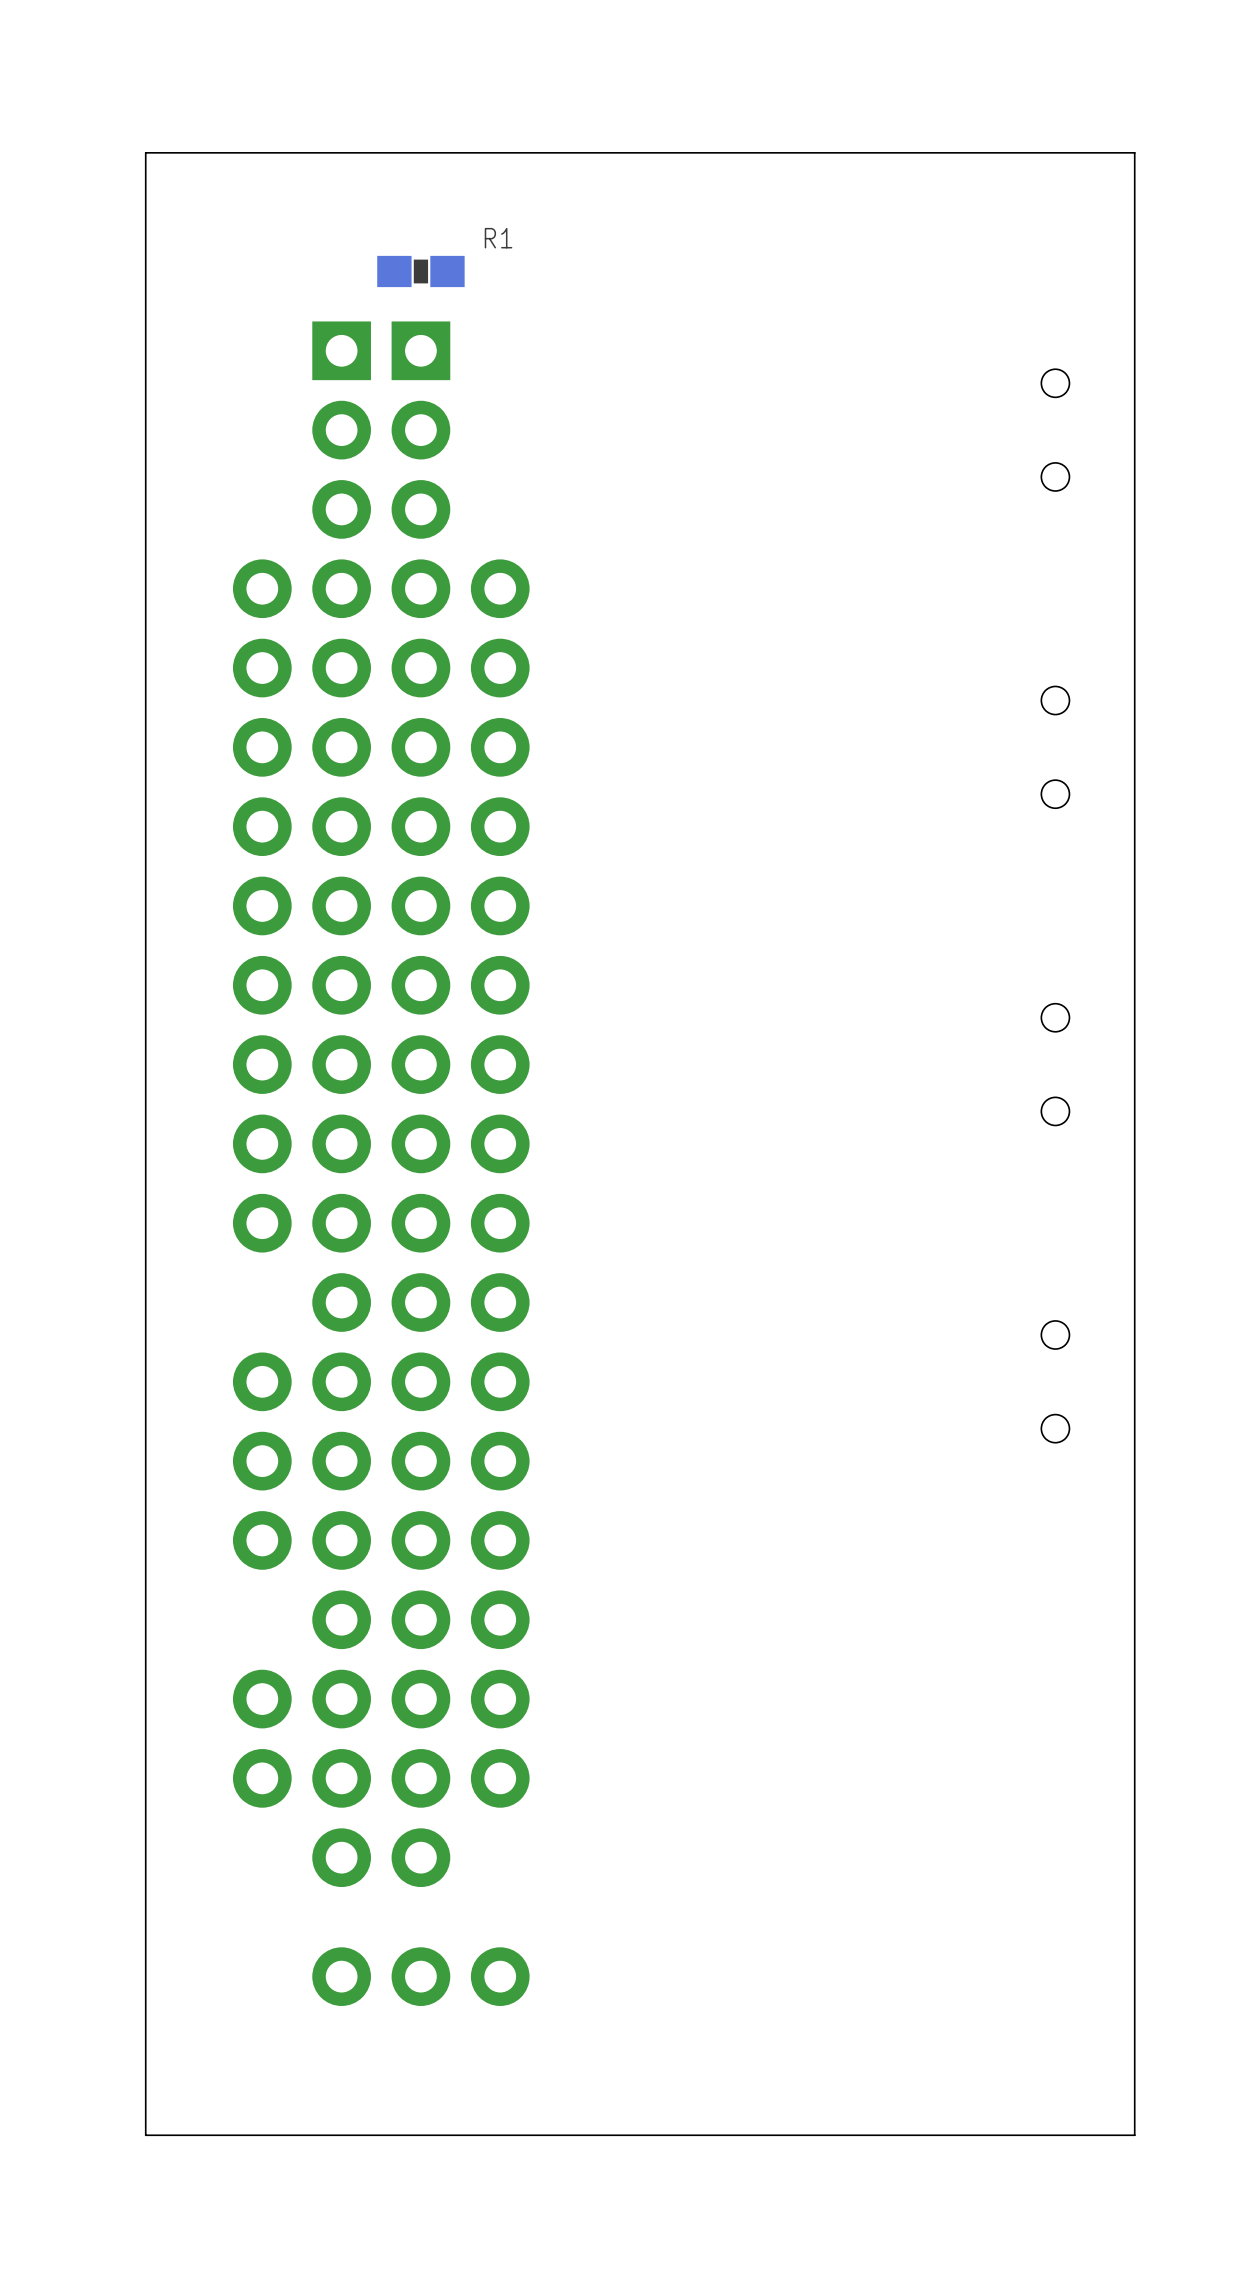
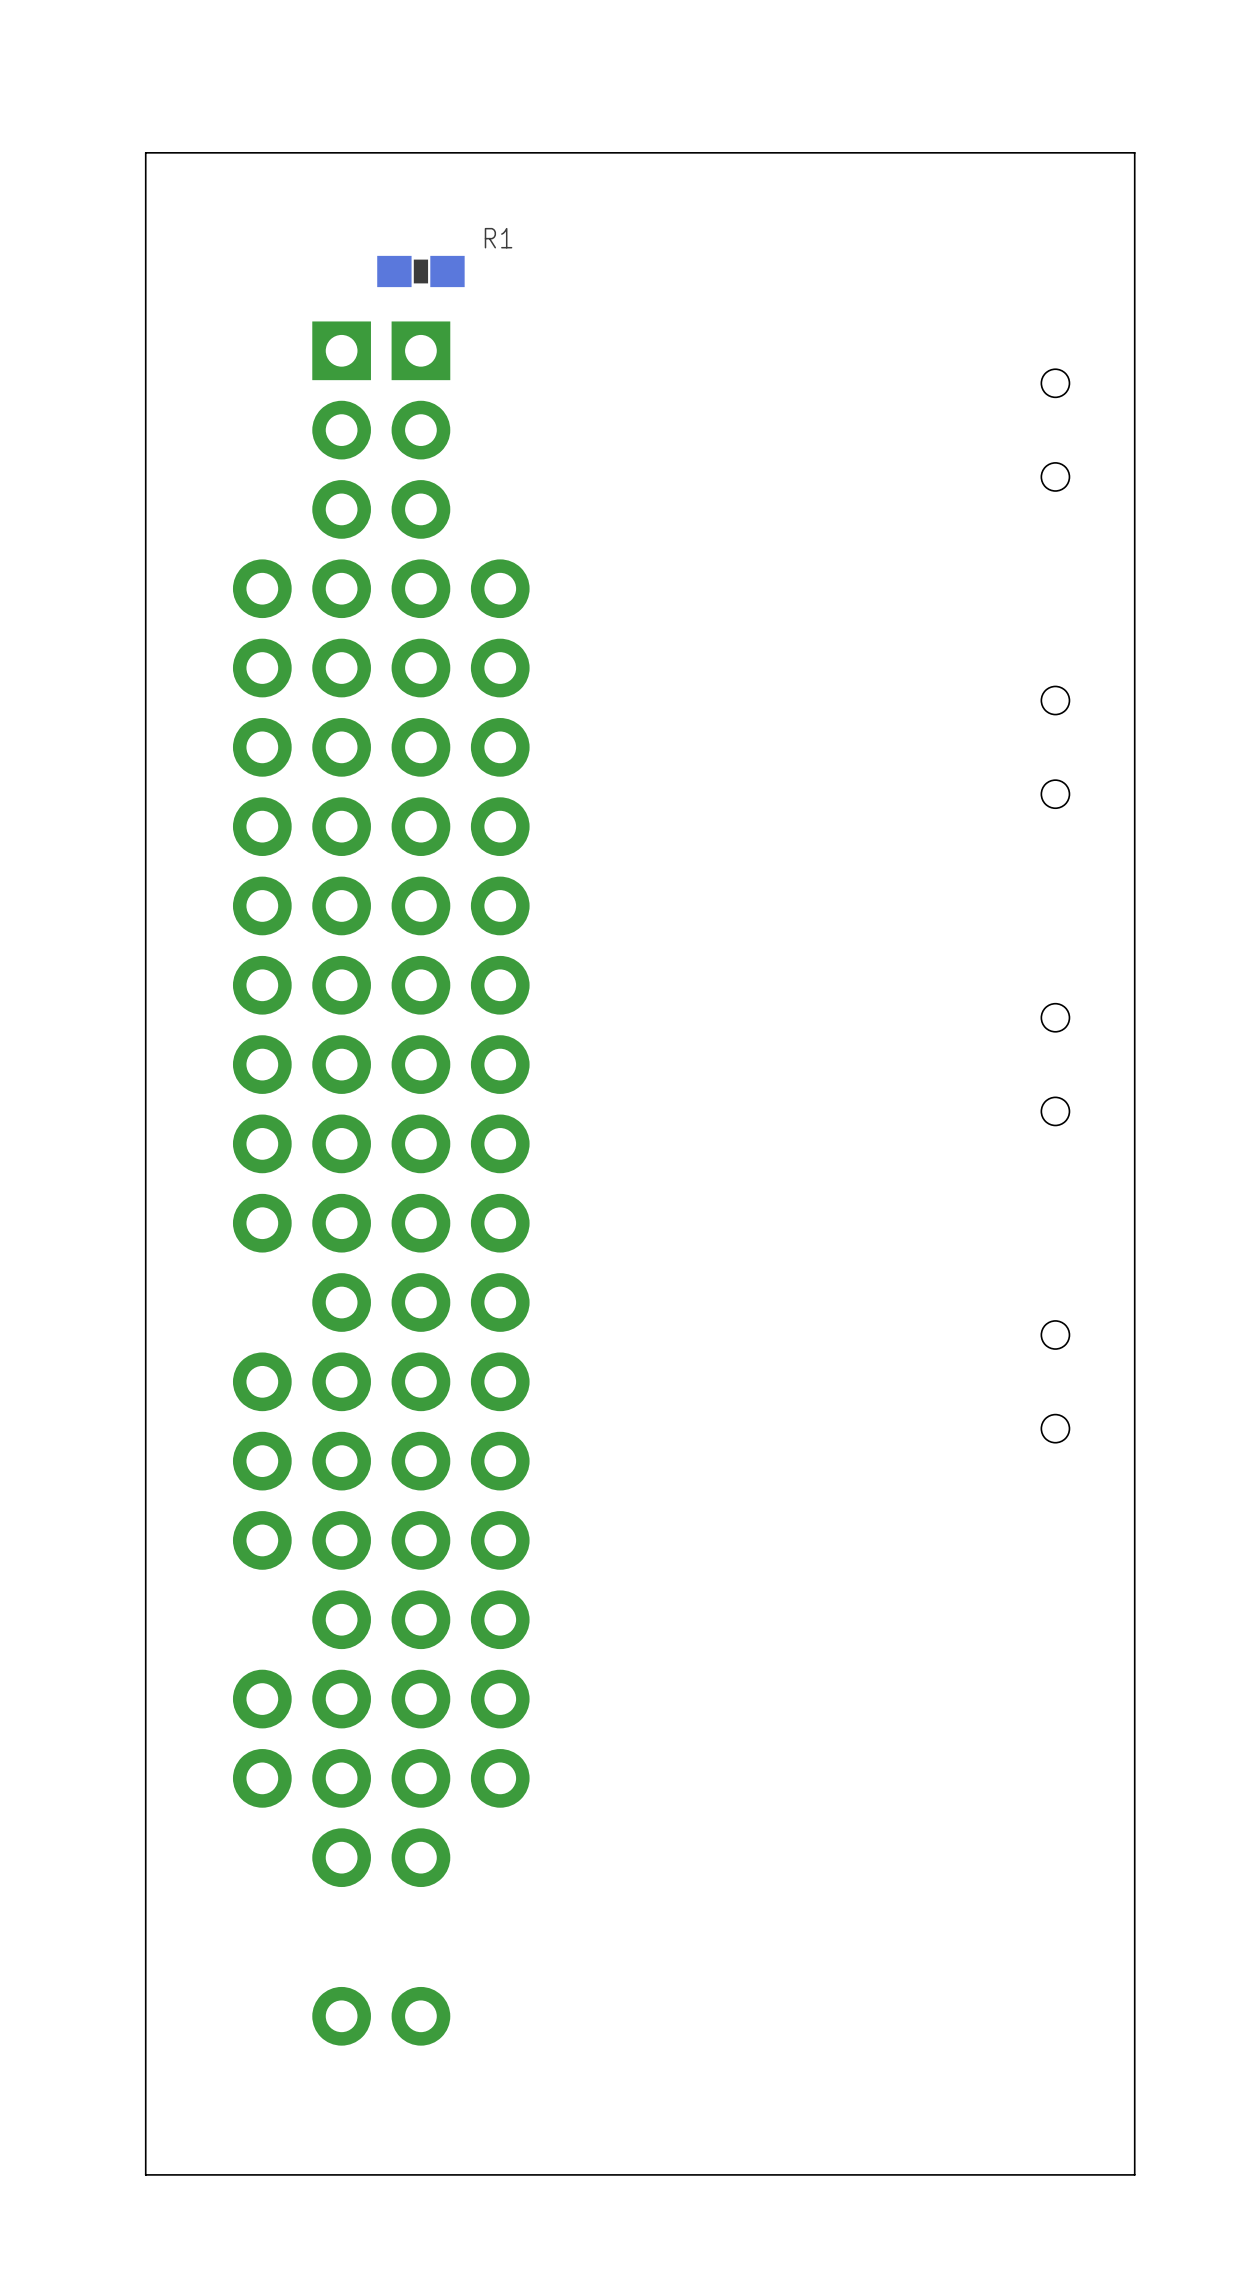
part: (420, 1976) -> none
part: none -> (381, 2016)
board edge: (1134, 2135) (145, 2135) -> (1134, 2135) (1134, 2174) (145, 2174) (145, 2135)

